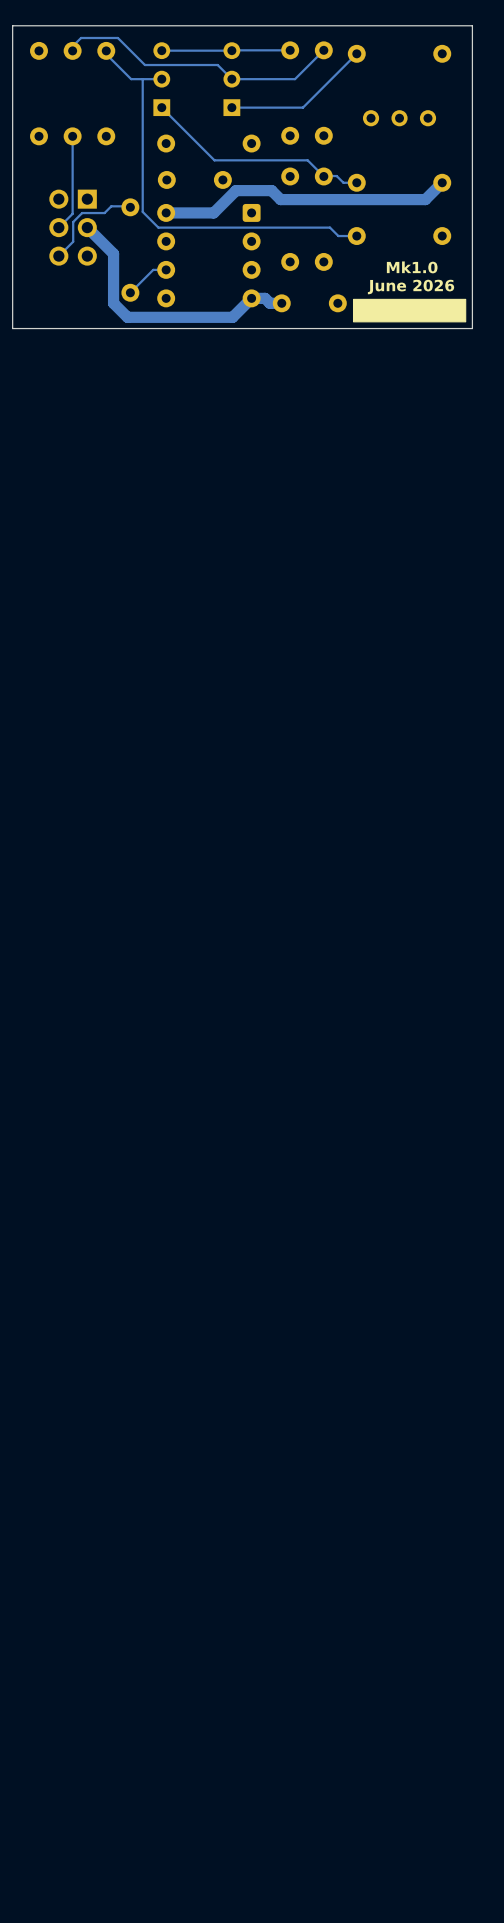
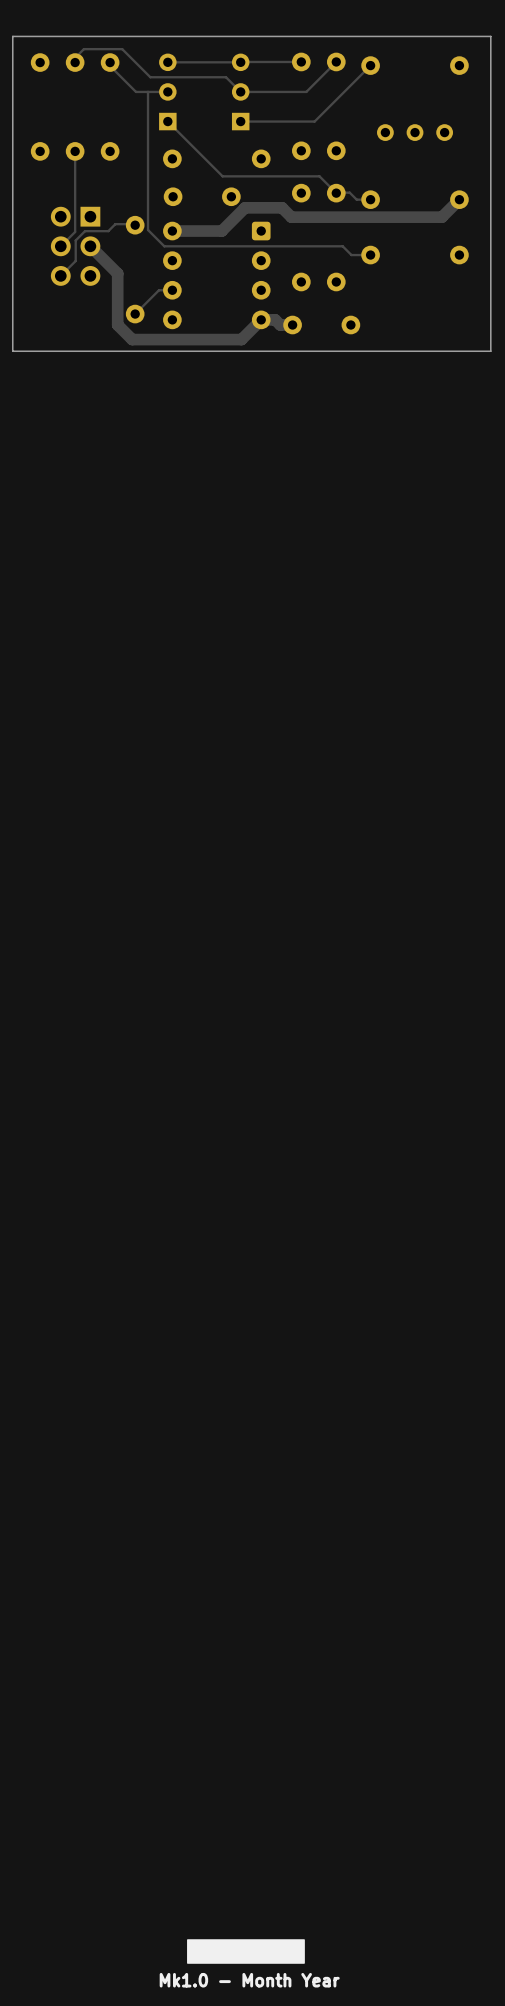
text: Mk1.0 (412, 267) -> none
text: June 2026 (411, 287) -> none
drawing: [352, 298, 467, 323] -> none
drawing: none -> [187, 1939, 305, 1964]
text: none -> Mk1.0 - Month Year (249, 1980)

